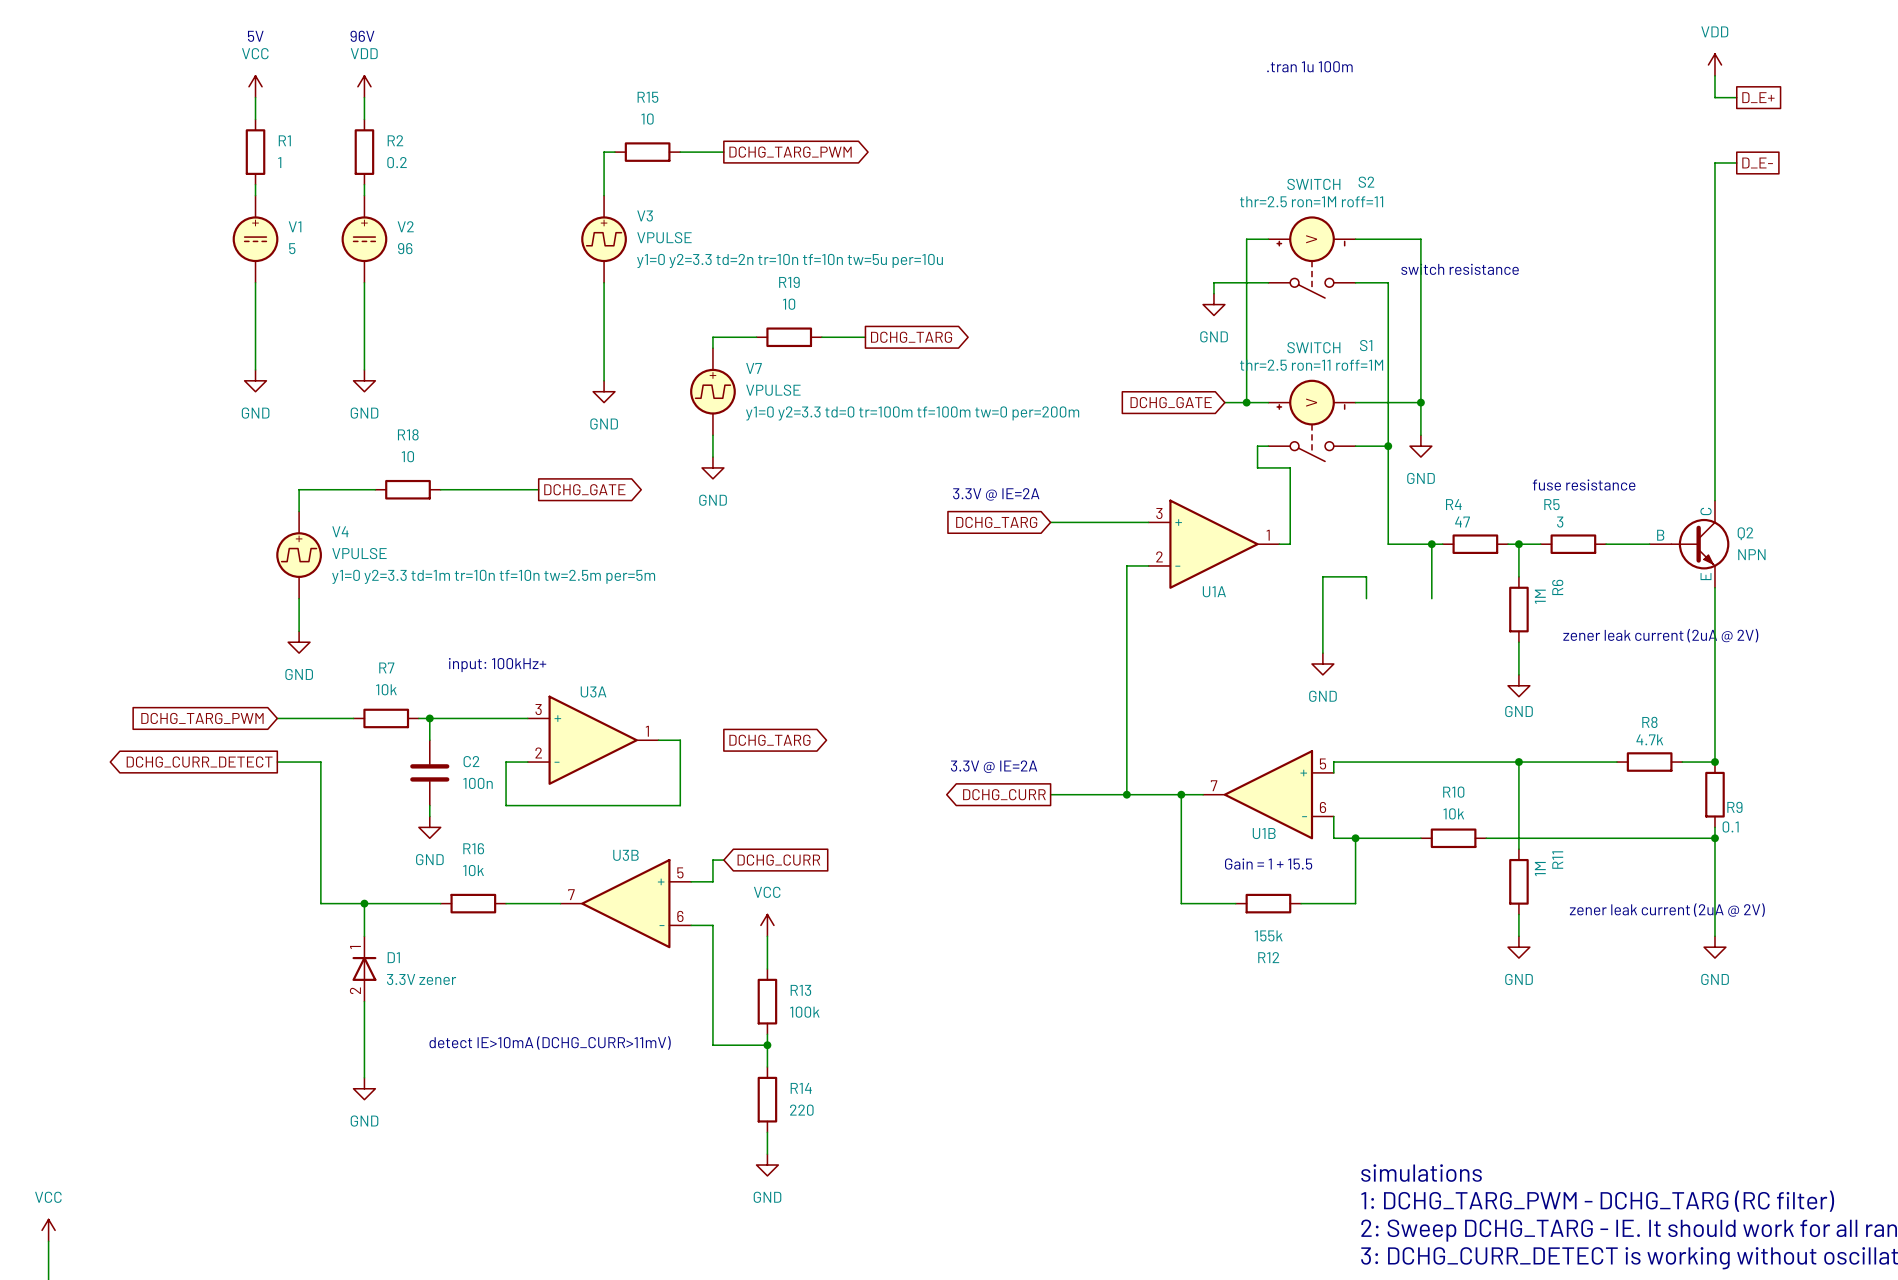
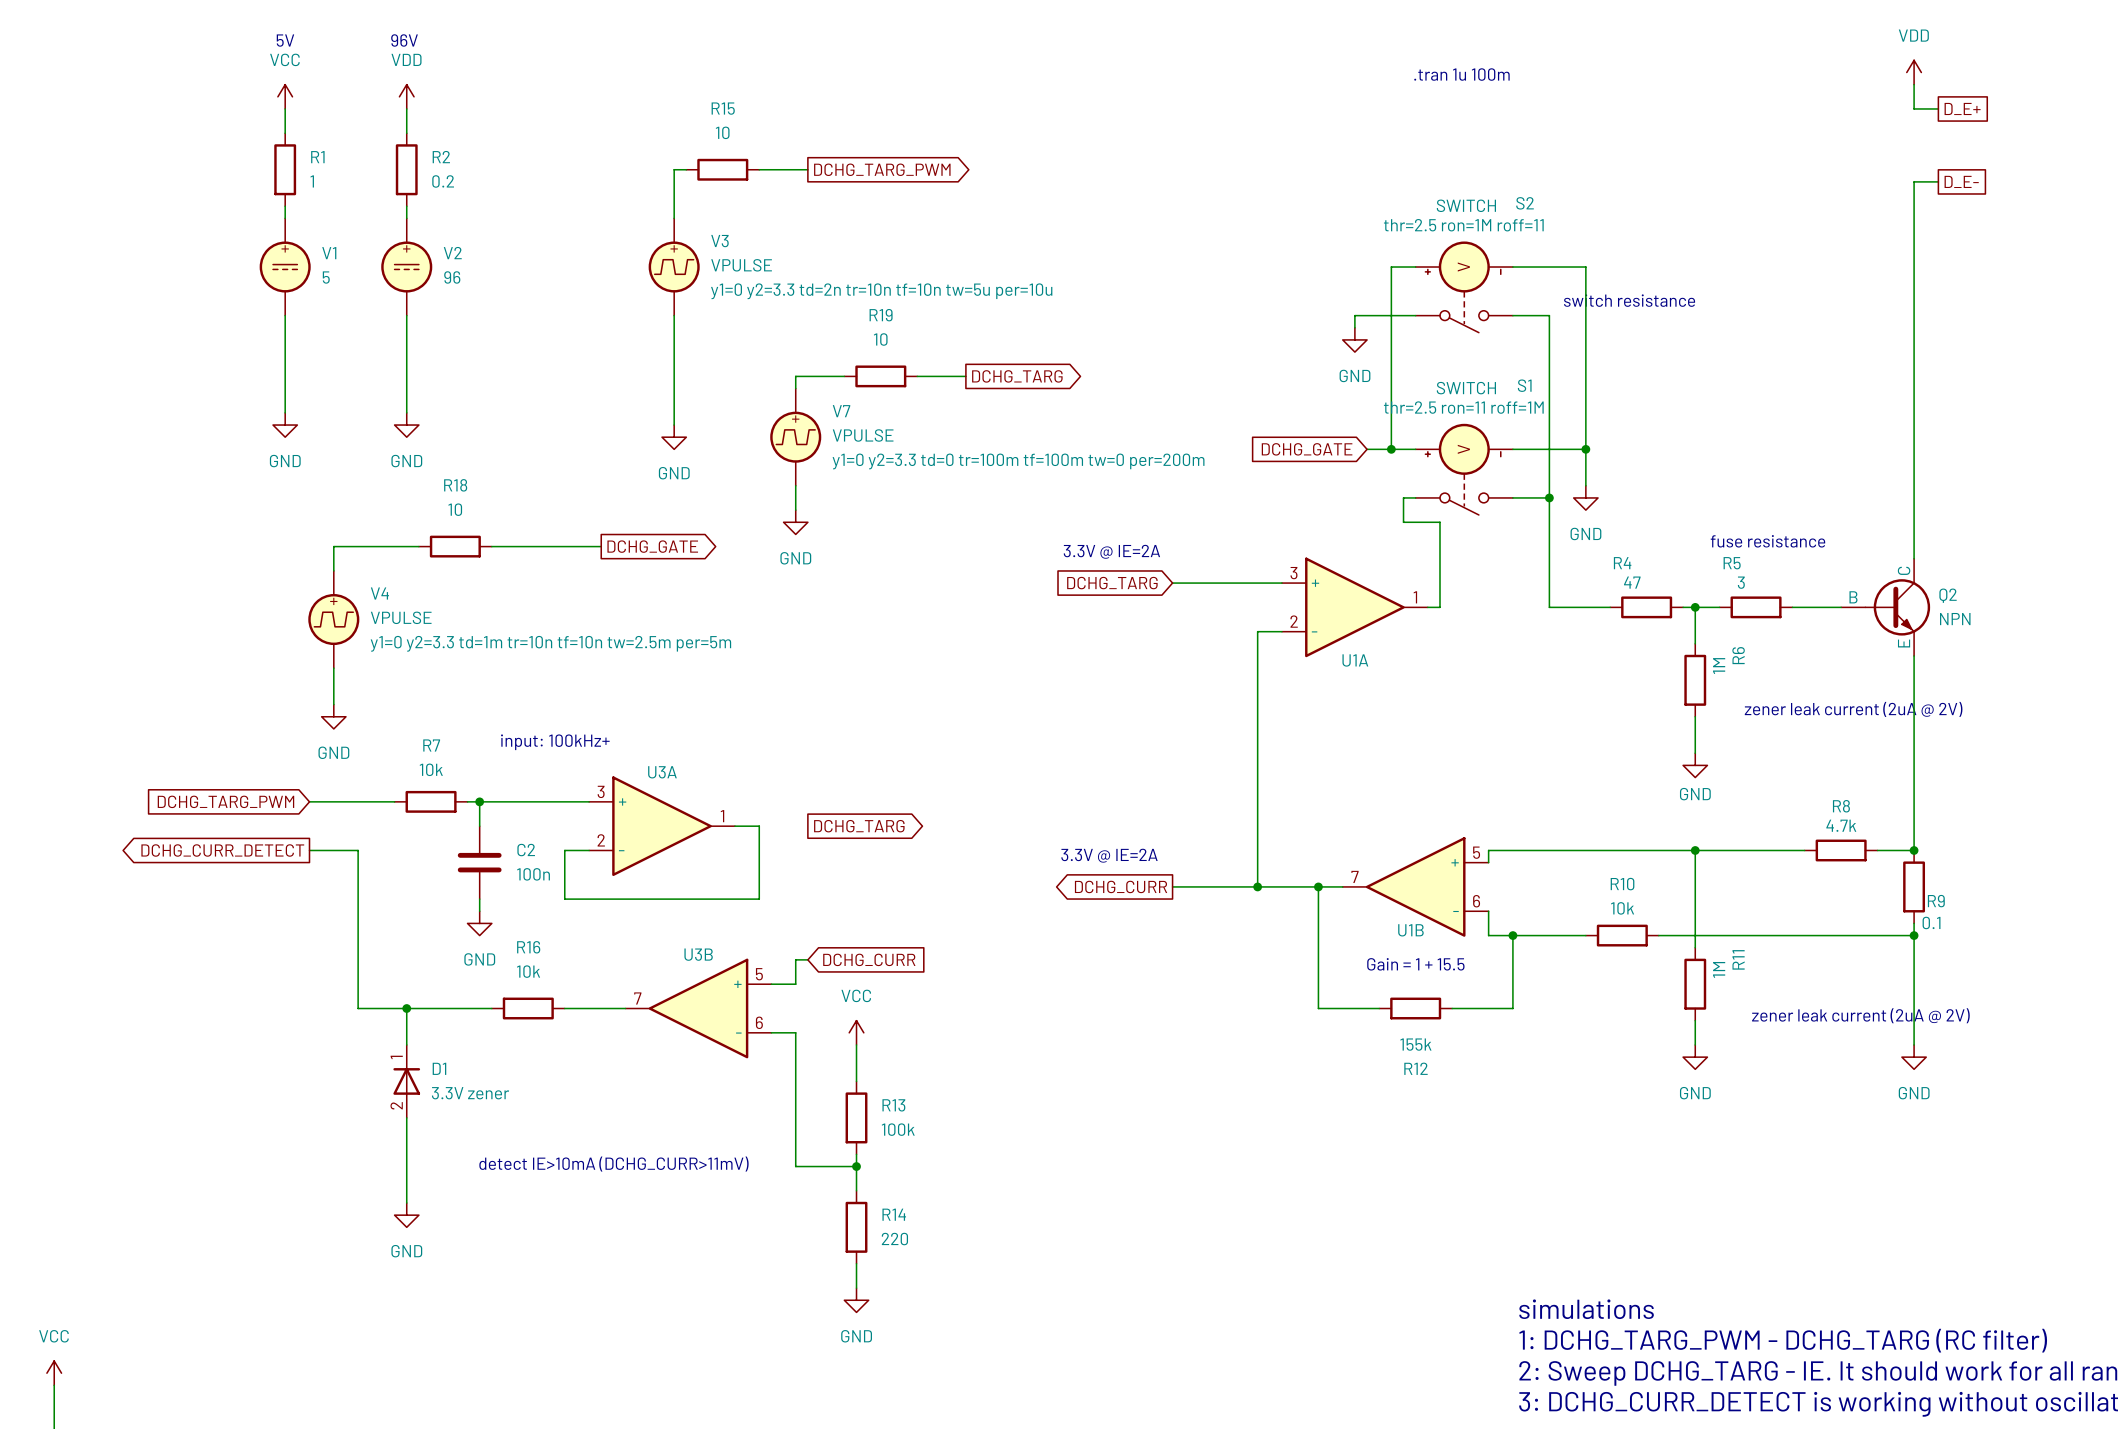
wire: (1431, 544) (1431, 598) -> none
junction: (1431, 544) -> none
wire: (1366, 598) (1366, 576) (1322, 576) (1322, 653) -> none
power symbol: GND (1322, 664) -> none

